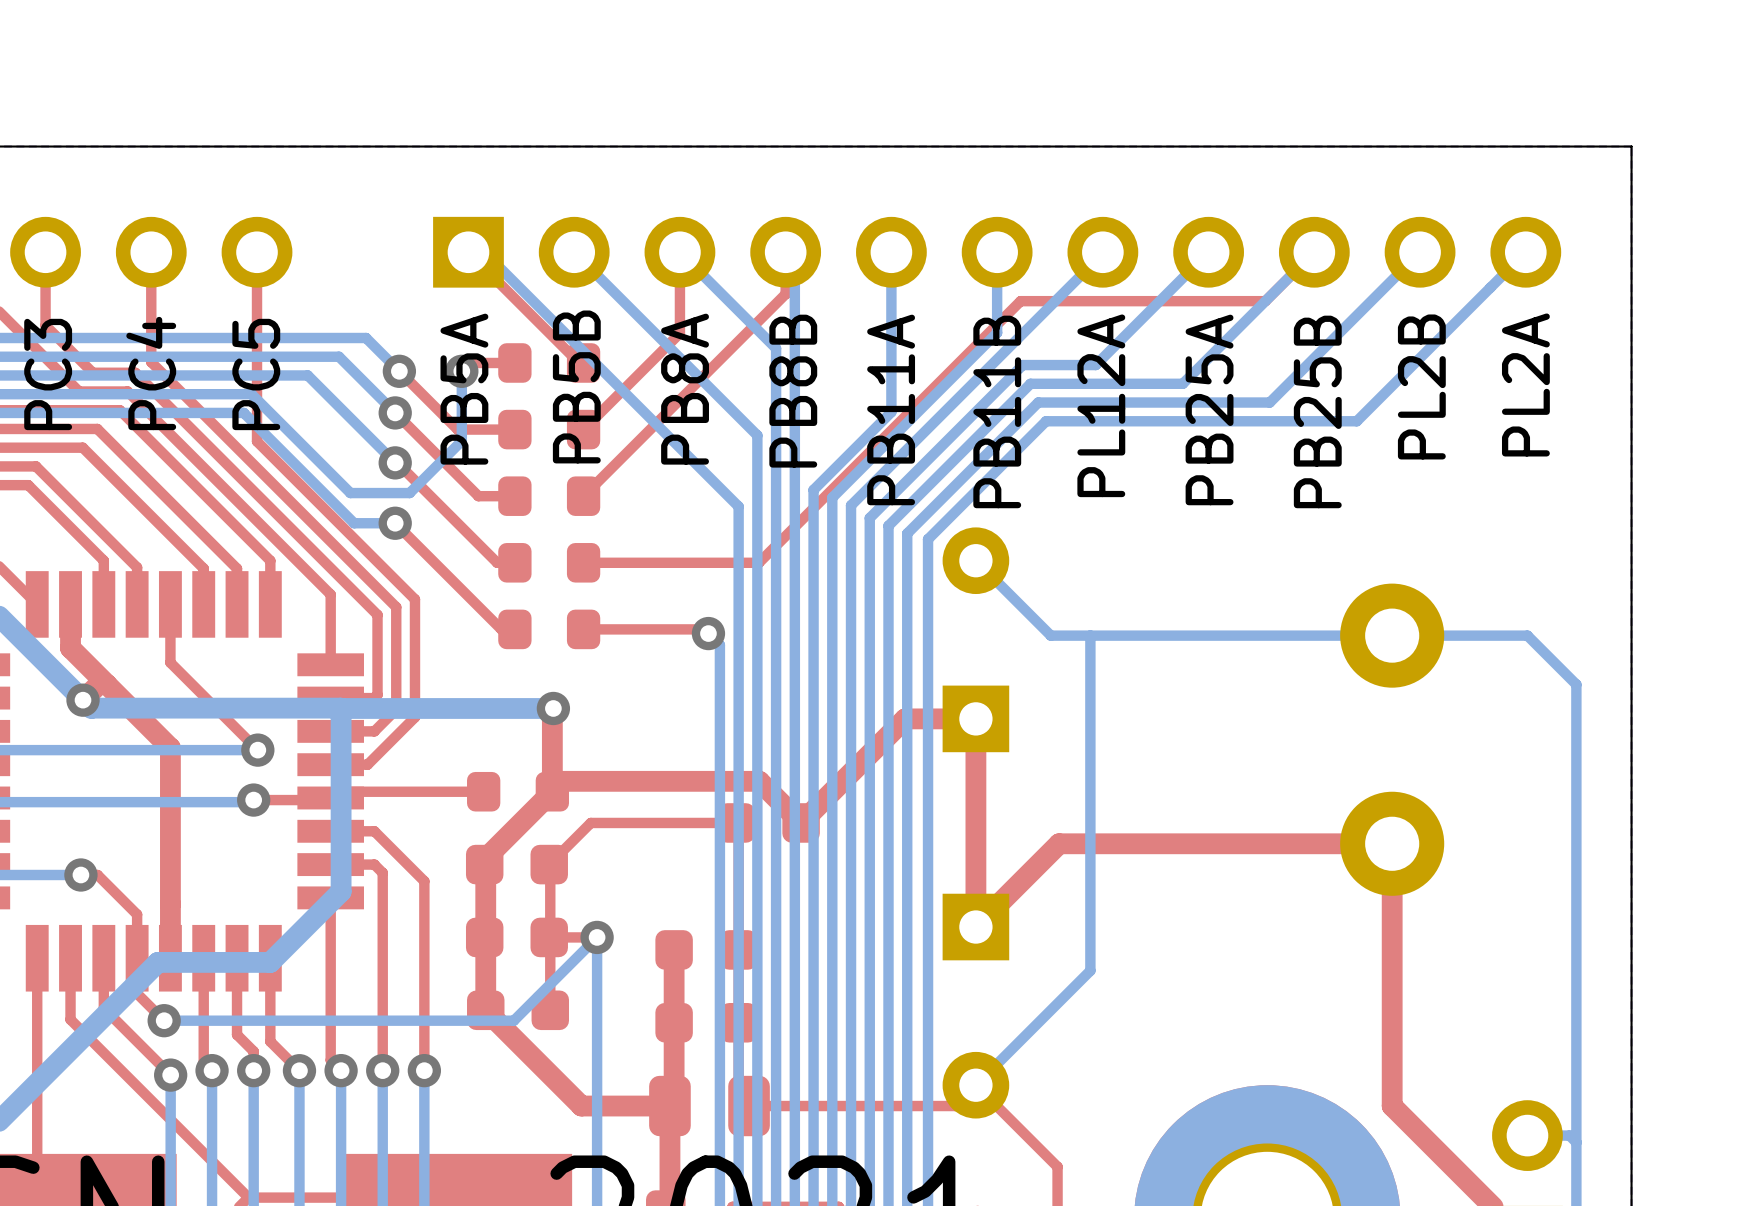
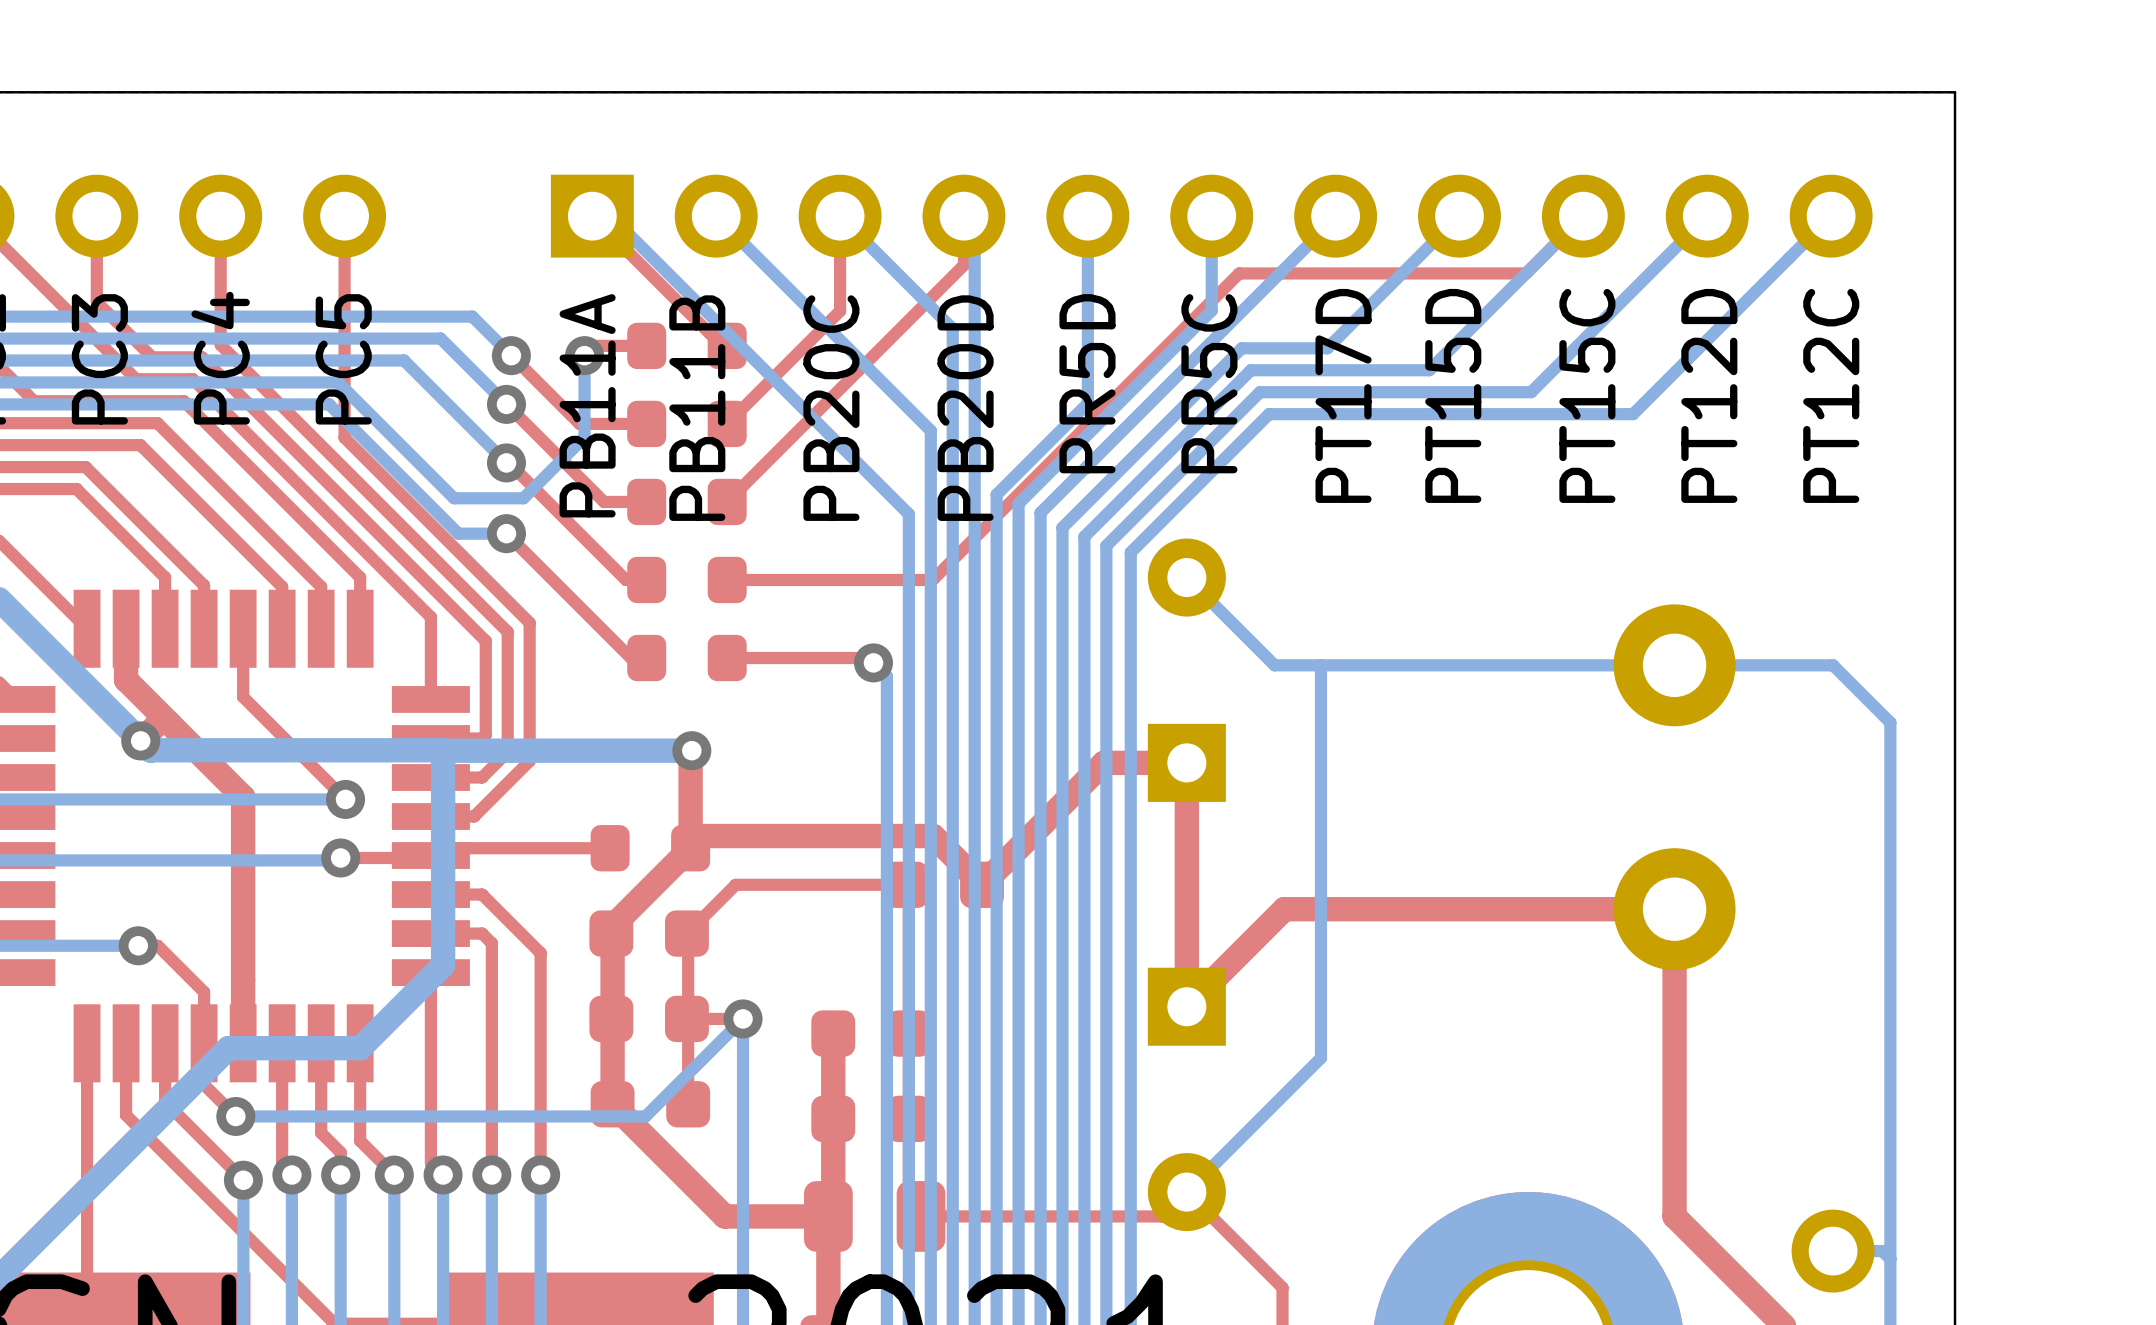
text: PL2A (1525, 384) -> PT12C (1831, 395)
text: PB5B (576, 386) -> PB11B (697, 408)
text: PL2B (1421, 386) -> PT12D (1709, 395)
text: PB5A (464, 389) -> PB11A (587, 405)
text: PB8A (685, 389) -> PB20C (831, 408)
text: PB8B (793, 391) -> PB20D (965, 408)
text: PL12A (1101, 405) -> PT17D (1343, 395)
text: PB11A (891, 409) -> PR5D (1087, 383)
text: PB25A (1209, 409) -> PT15D (1453, 395)
text: PB11B (997, 411) -> PR5C (1209, 383)
text: PB25B (1317, 411) -> PT15C (1587, 395)

